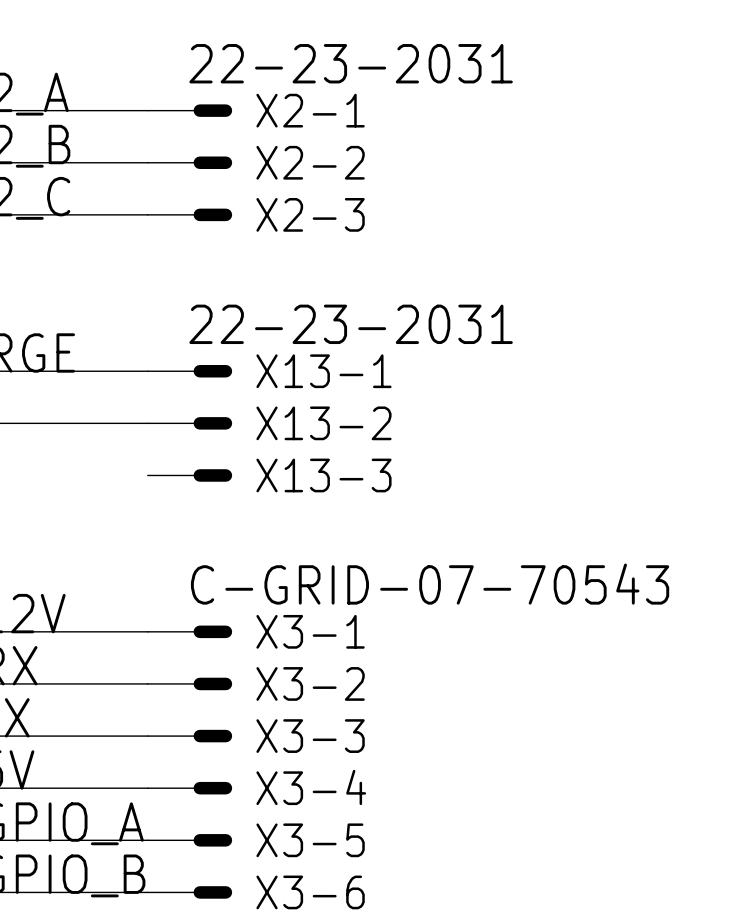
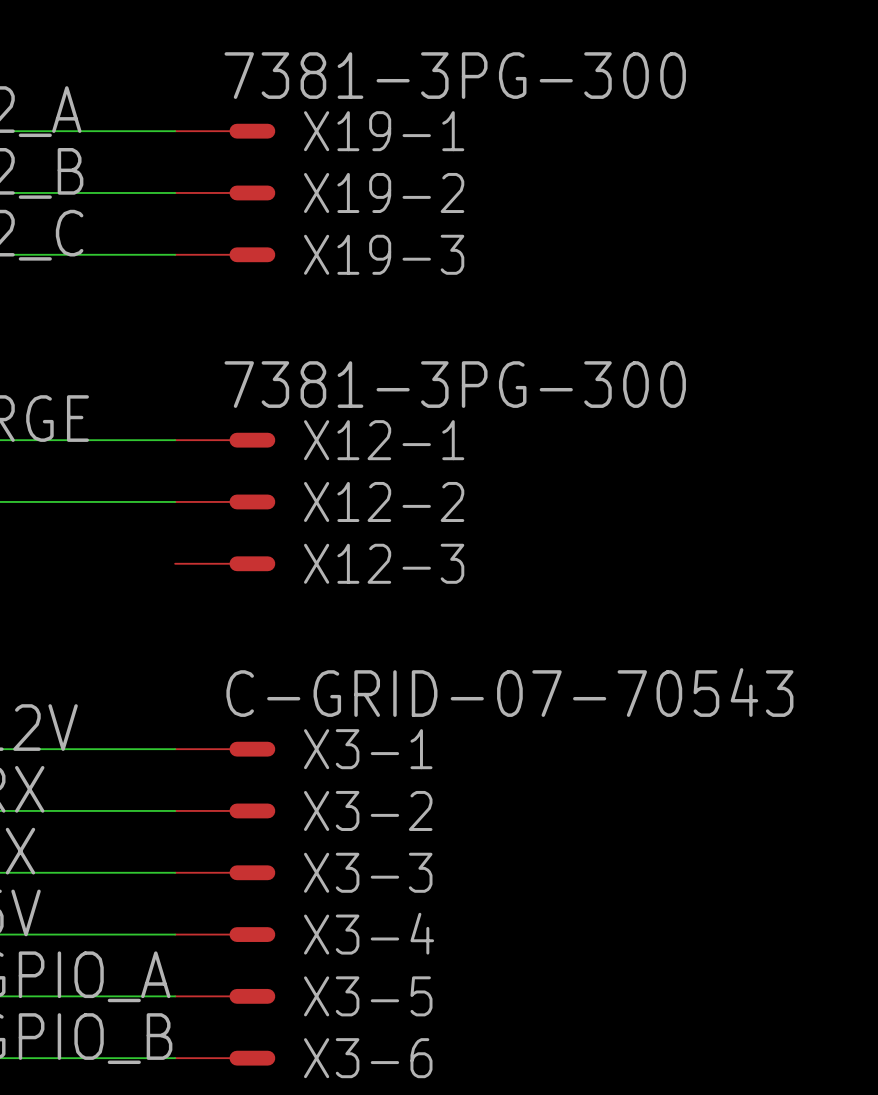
X2-1 value: 22-23-2031 (351, 63) -> 7381-3PG-300 (455, 75)
X2-1 name: X2-1 (310, 110) -> X19-1 (384, 131)
X2-2 name: X2-2 (310, 162) -> X19-2 (384, 192)
X2-3 name: X2-3 (310, 214) -> X19-3 (384, 254)
X13-1 value: 22-23-2031 (351, 324) -> 7381-3PG-300 (455, 384)
X13-1 name: X13-1 (323, 371) -> X12-1 (384, 440)
X13-2 name: X13-2 (323, 423) -> X12-2 (384, 501)
X13-3 name: X13-3 (323, 475) -> X12-3 (384, 563)

